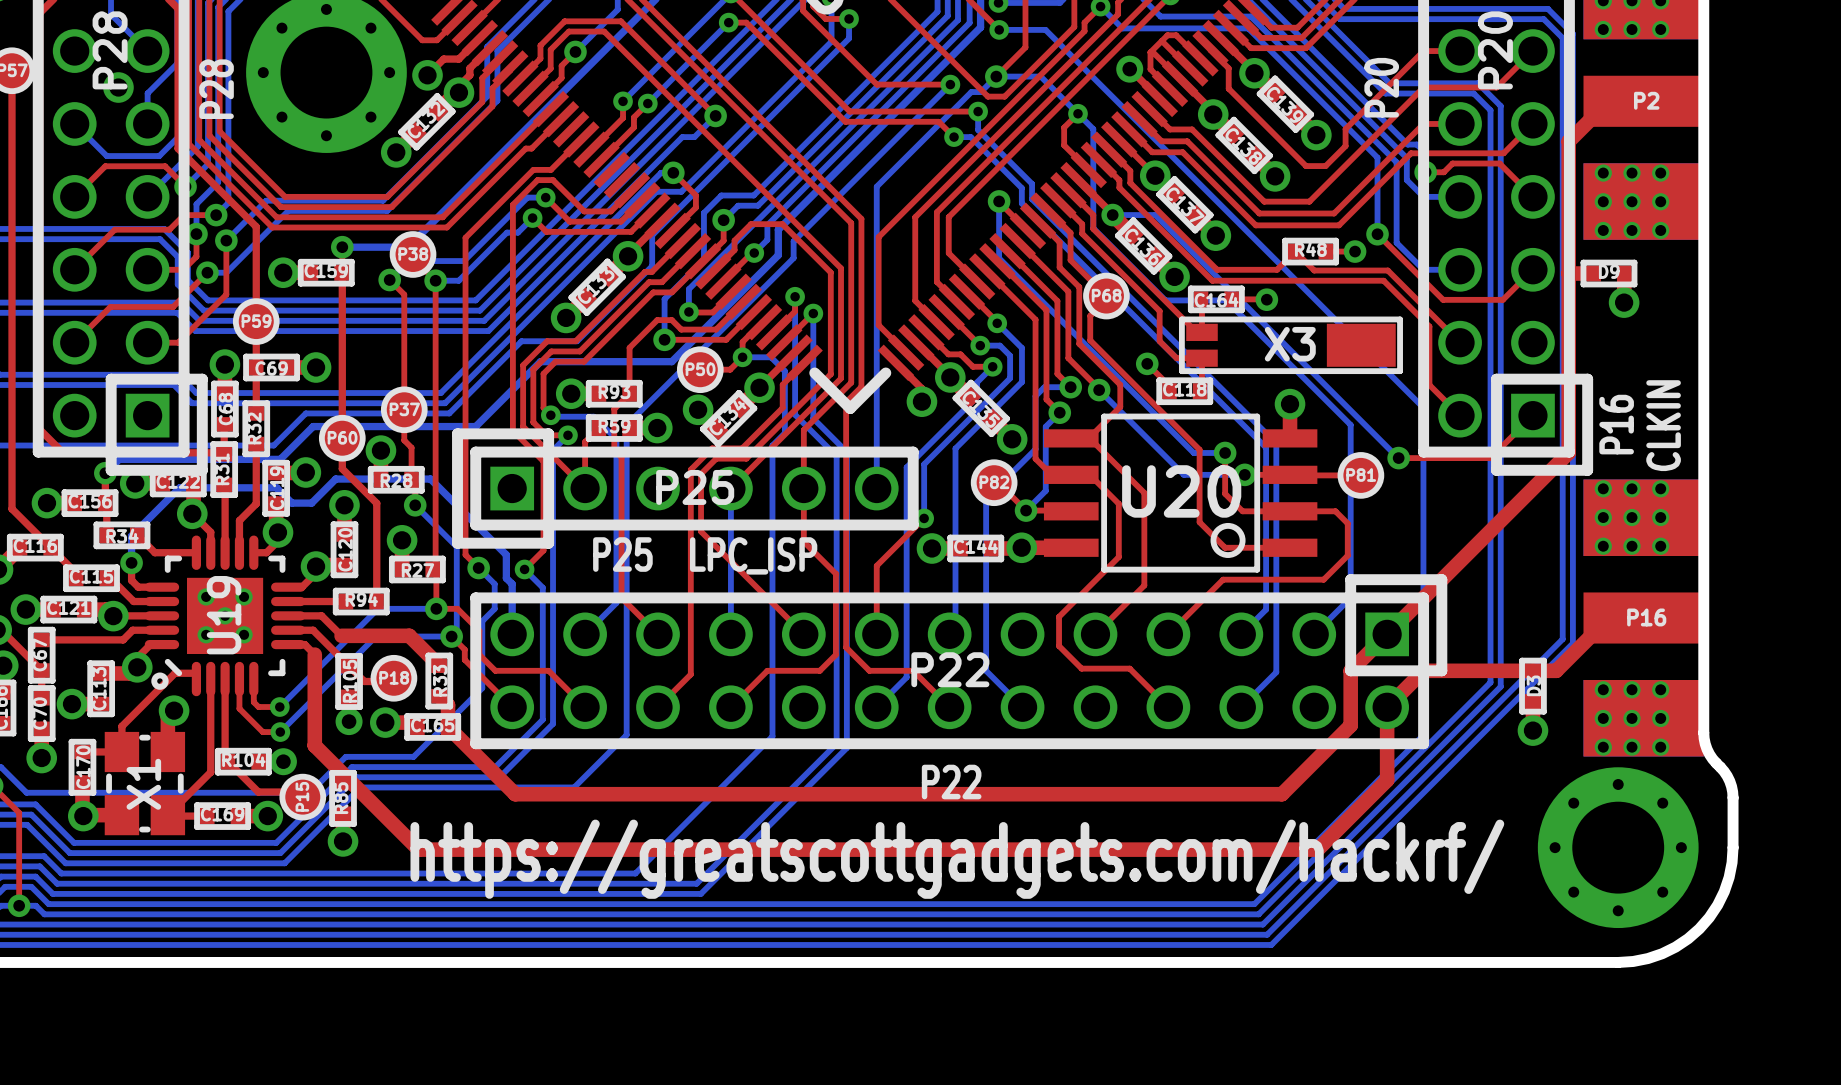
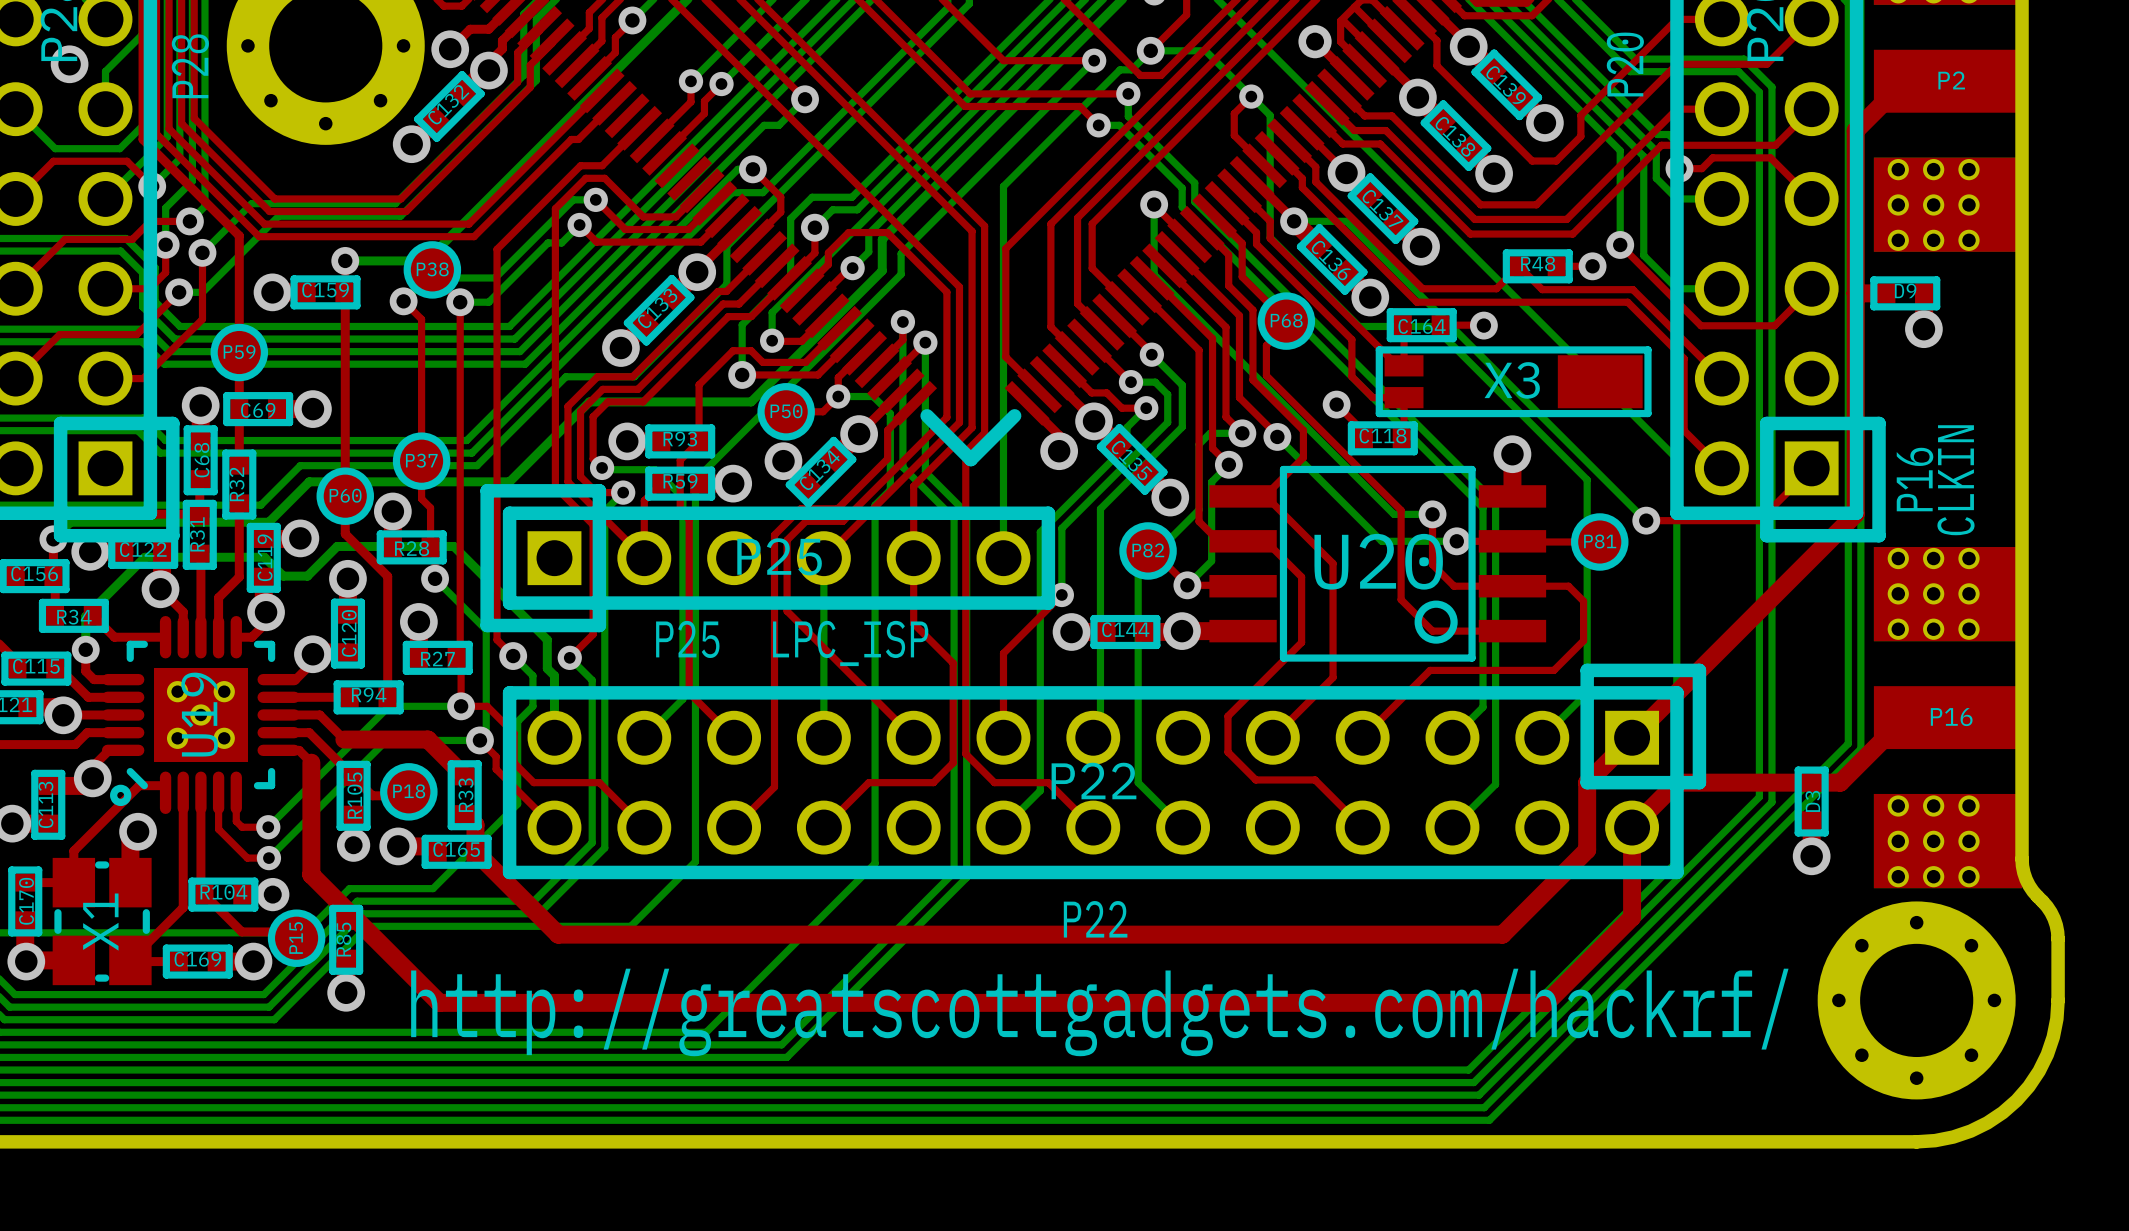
text position: CLKIN (1663, 425) -> CLKIN (1955, 480)
text: https://greatscottgadgets.com/hackrf/ (957, 859) -> http://greatscottgadgets.com/hackrf/ (1099, 1012)

